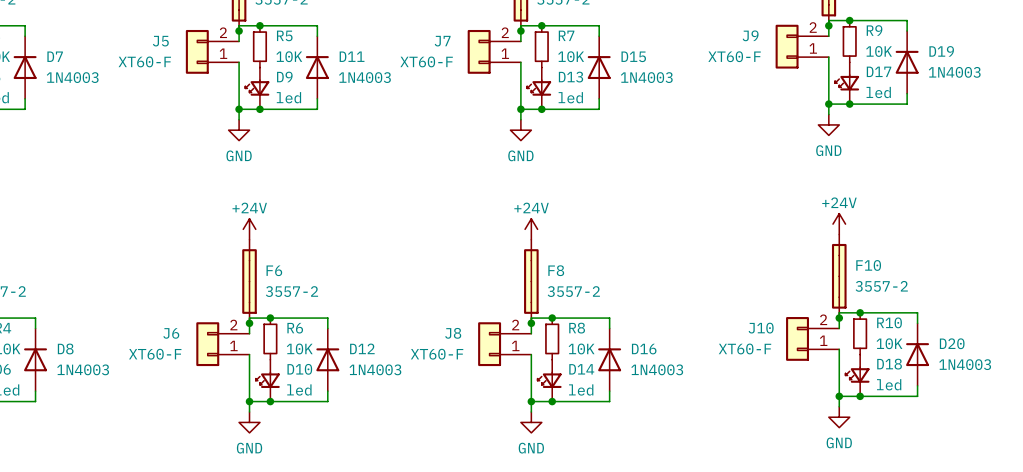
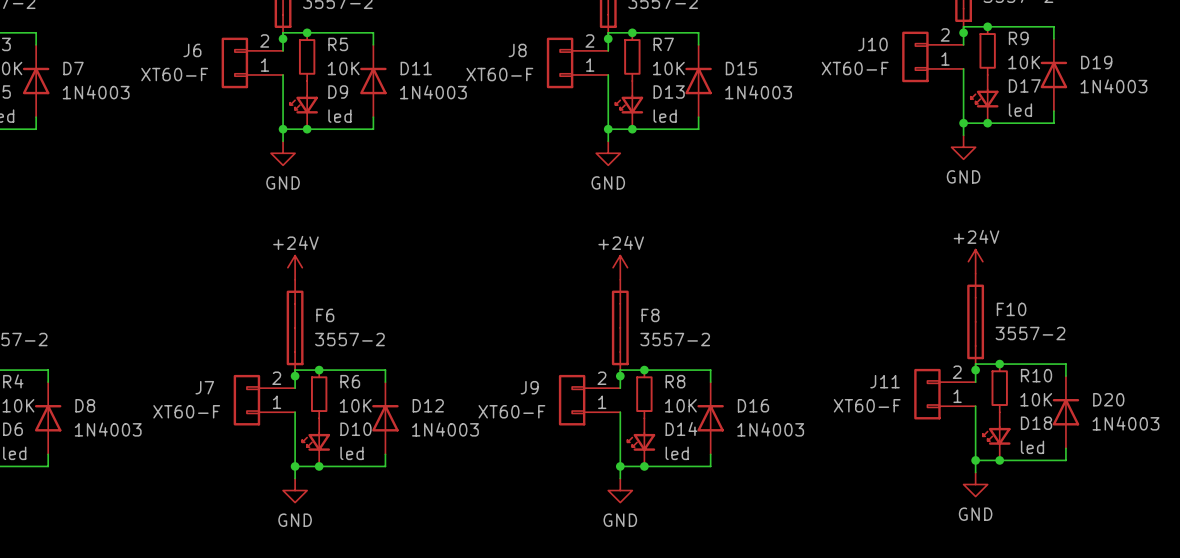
J9 name: J9 (750, 35) -> J10 (872, 44)
J5 name: J5 (160, 41) -> J6 (192, 50)
J7 name: J7 (442, 41) -> J8 (517, 50)
J10 name: J10 (761, 328) -> J11 (885, 381)
J6 name: J6 (171, 333) -> J7 (204, 387)
J8 name: J8 (453, 333) -> J9 (529, 387)

